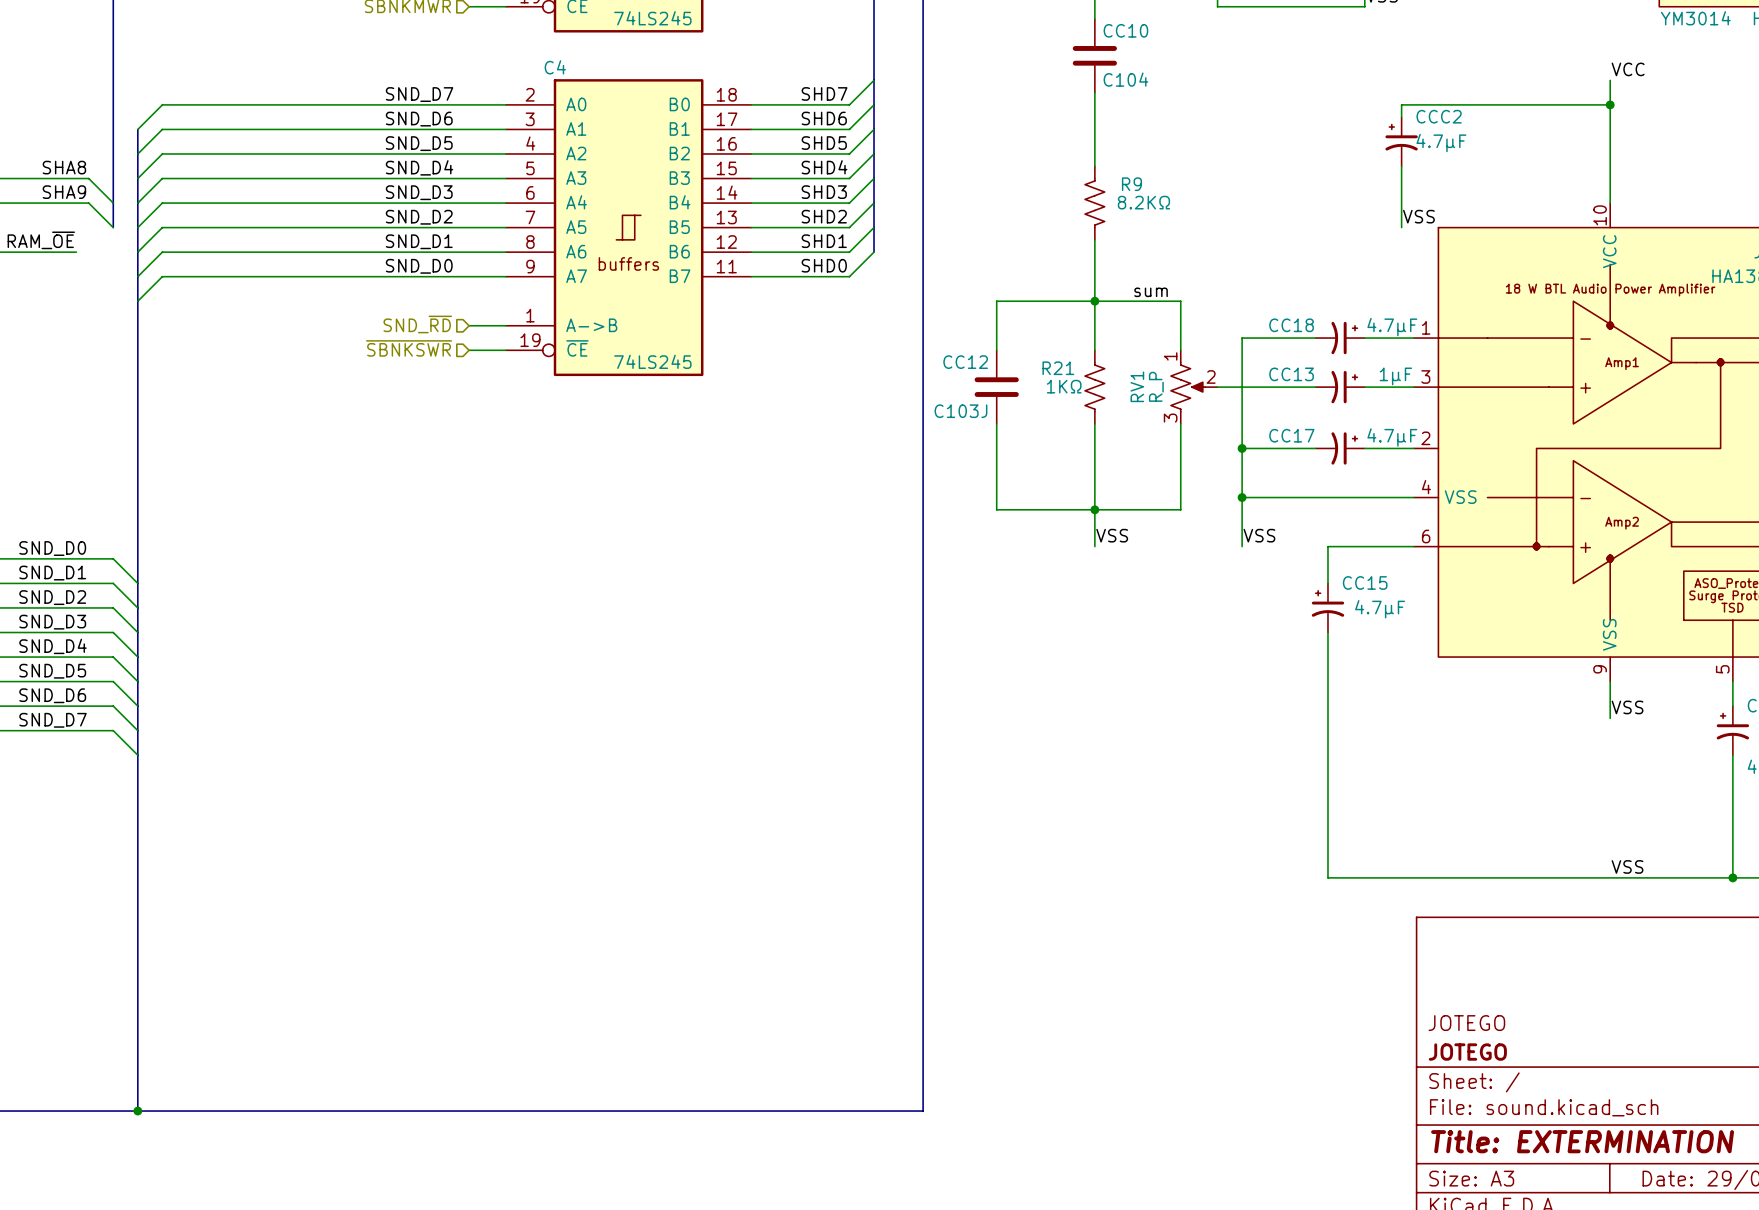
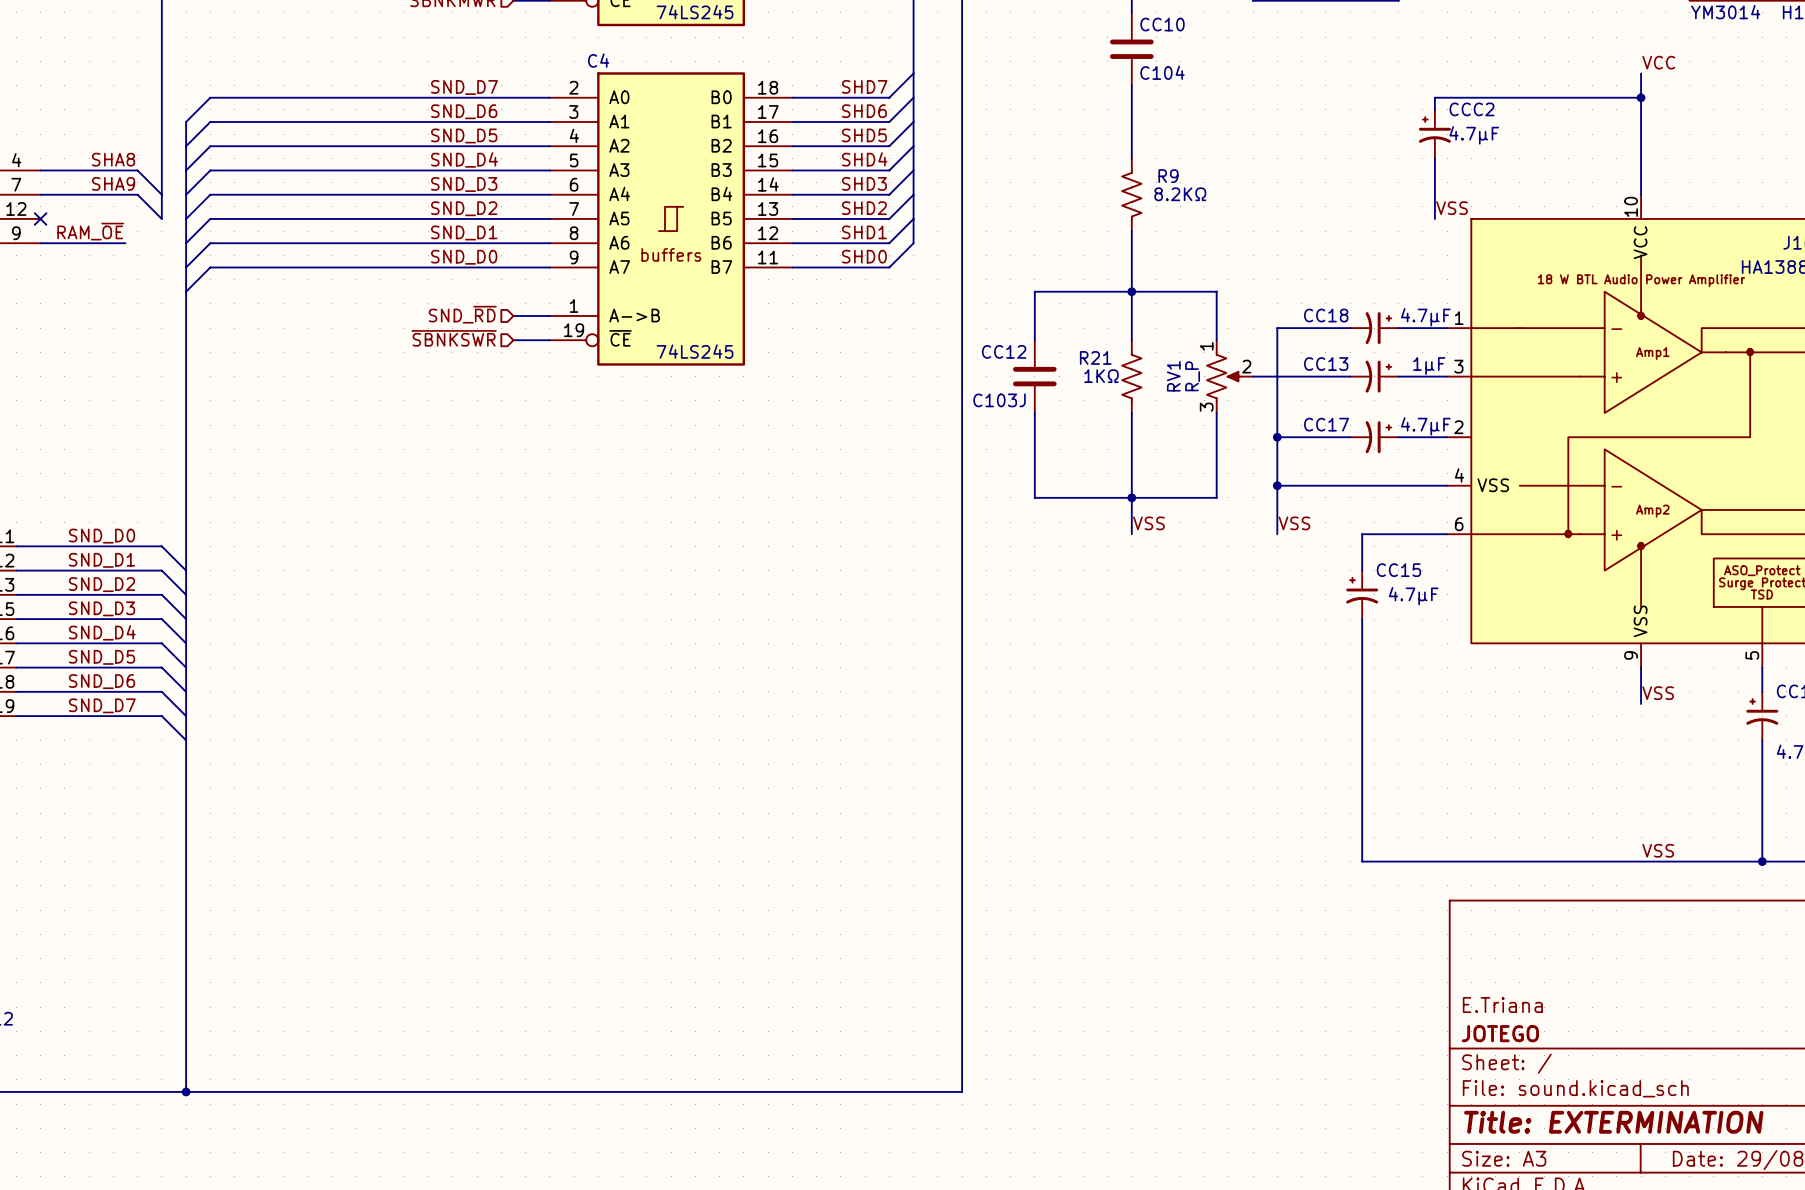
label: sum (1151, 292) -> none
title block: JOTEGO (1466, 1023) -> E.Triana (1502, 1005)

